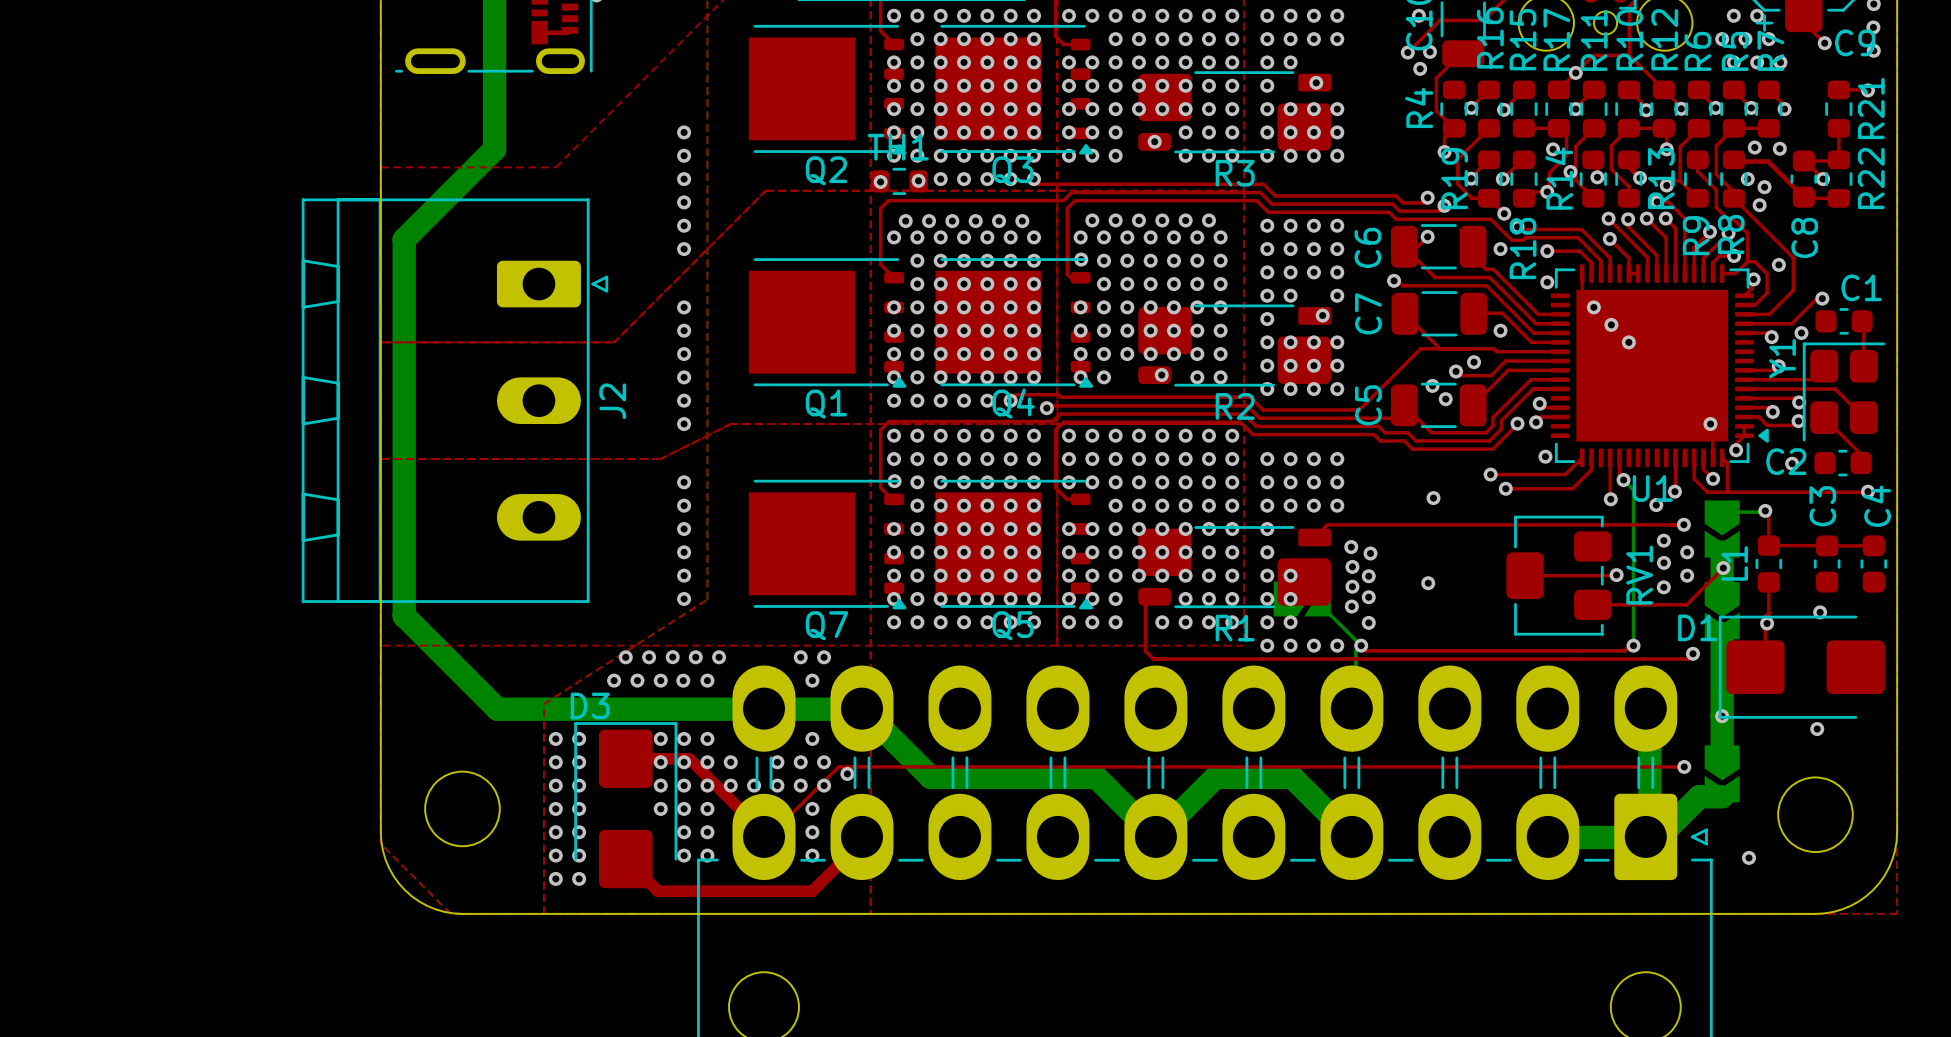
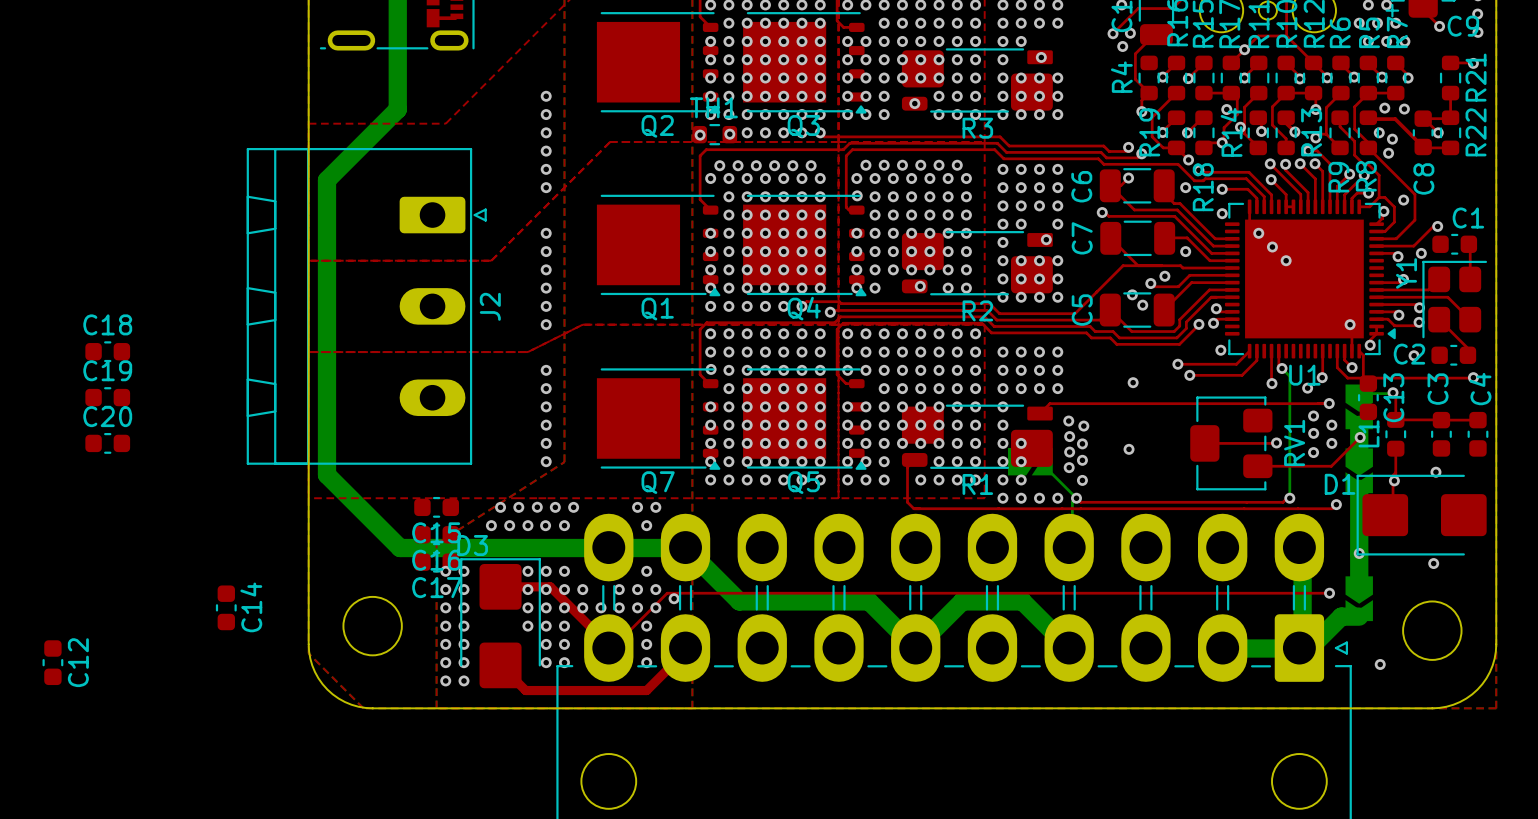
C18: none -> (107, 351)
C19: none -> (107, 397)
C13: none -> (1368, 397)
C20: none -> (107, 443)
C15: none -> (436, 507)
C16: none -> (436, 534)
C17: none -> (436, 562)
C14: none -> (226, 607)
C12: none -> (52, 662)

